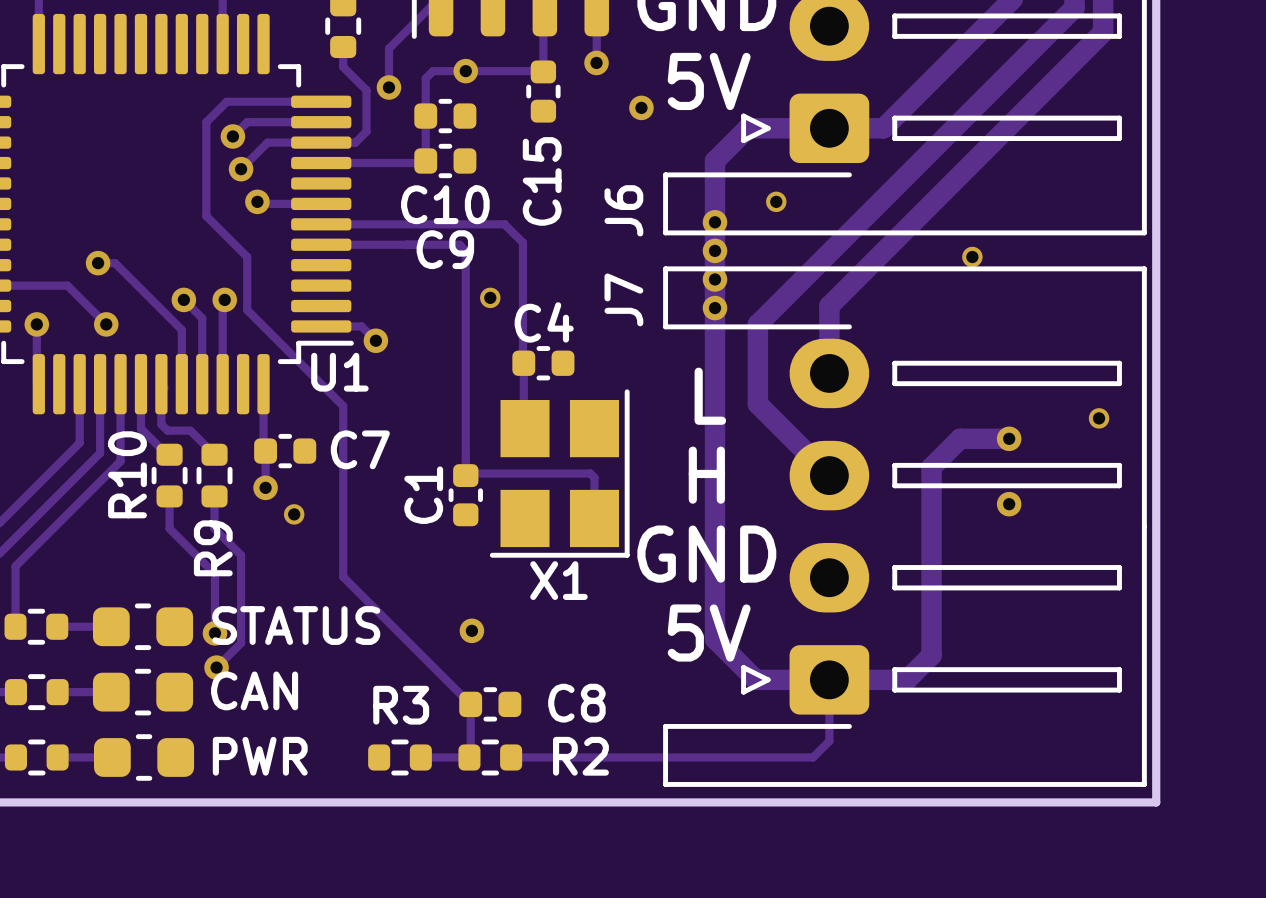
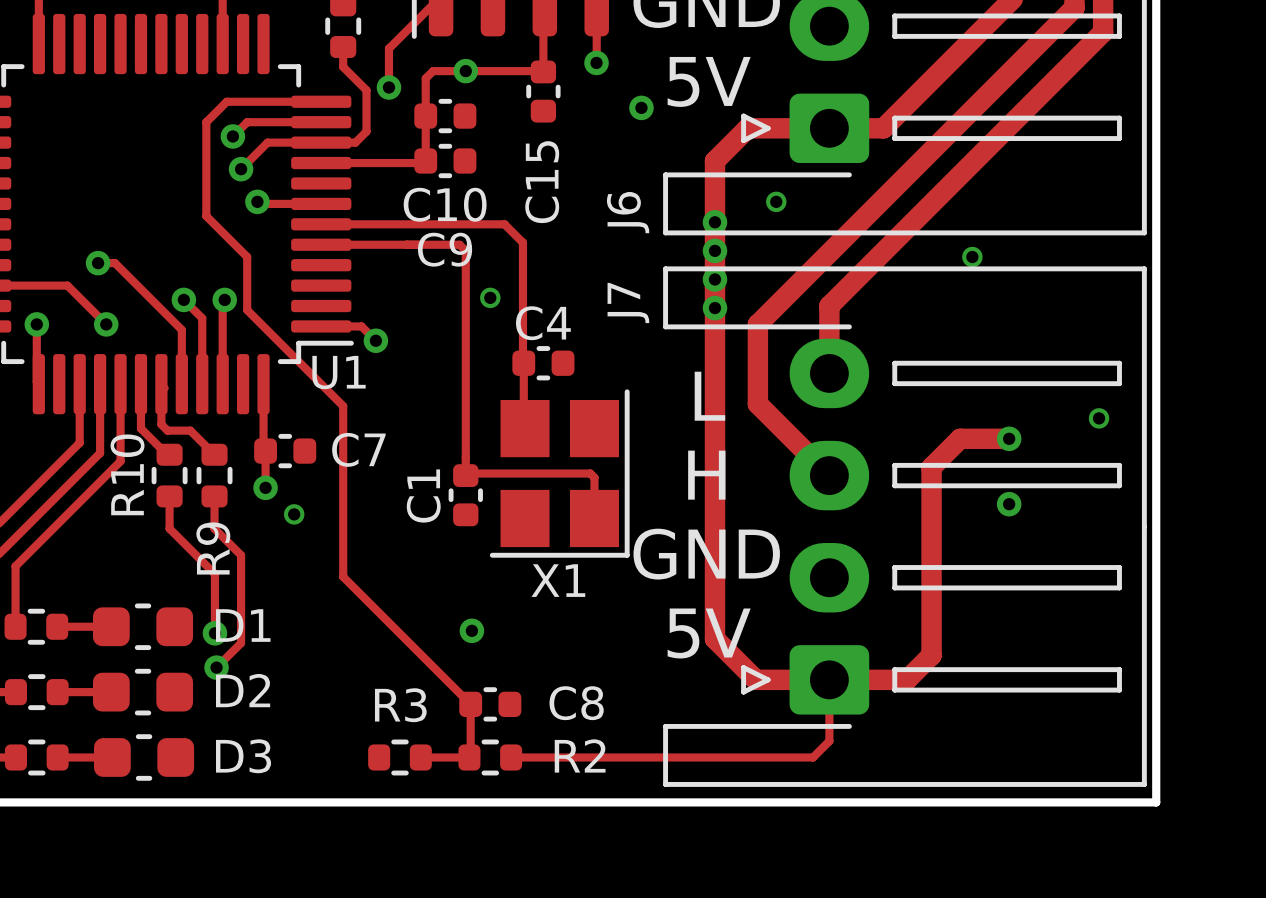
D1 name: none -> D1 (243, 625)
D1 text: STATUS (296, 625) -> none
D2 name: none -> D2 (243, 690)
D2 text: CAN (254, 690) -> none
D3 name: none -> D3 (243, 756)
D3 text: PWR (260, 756) -> none

